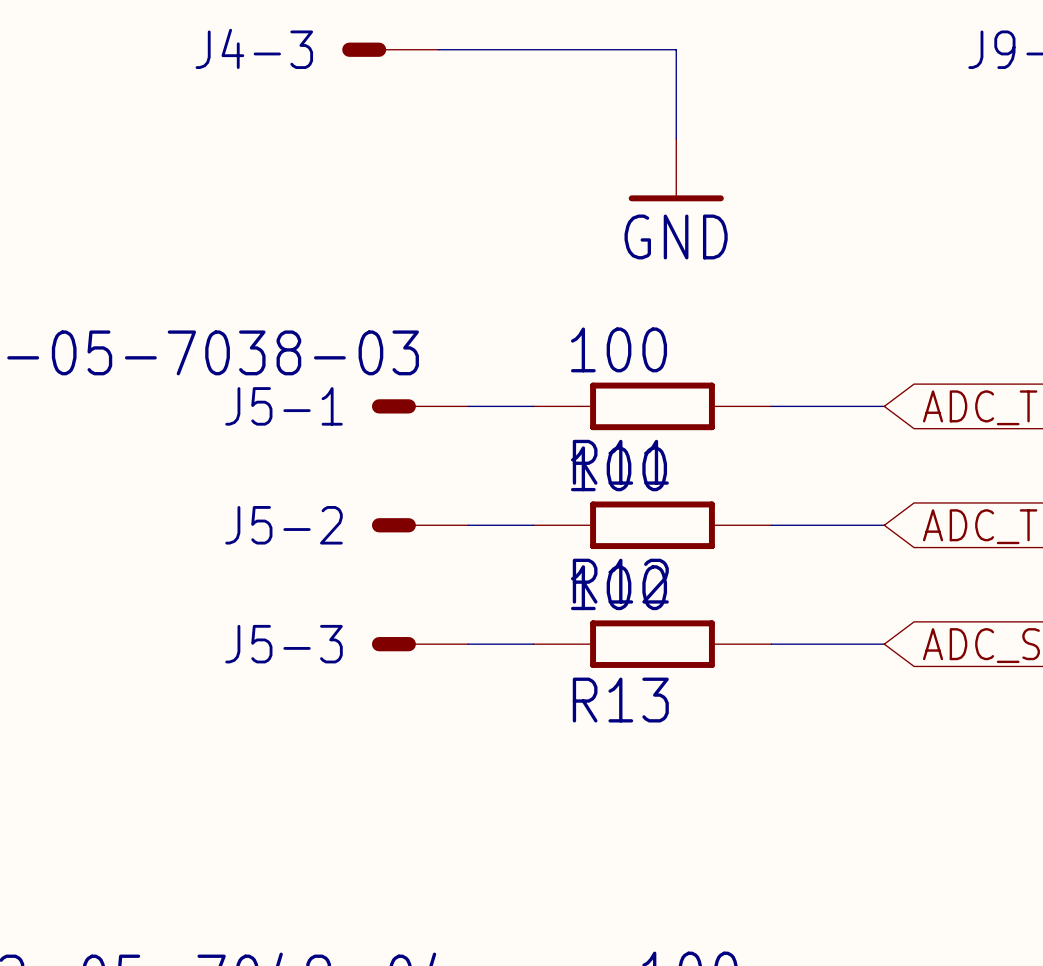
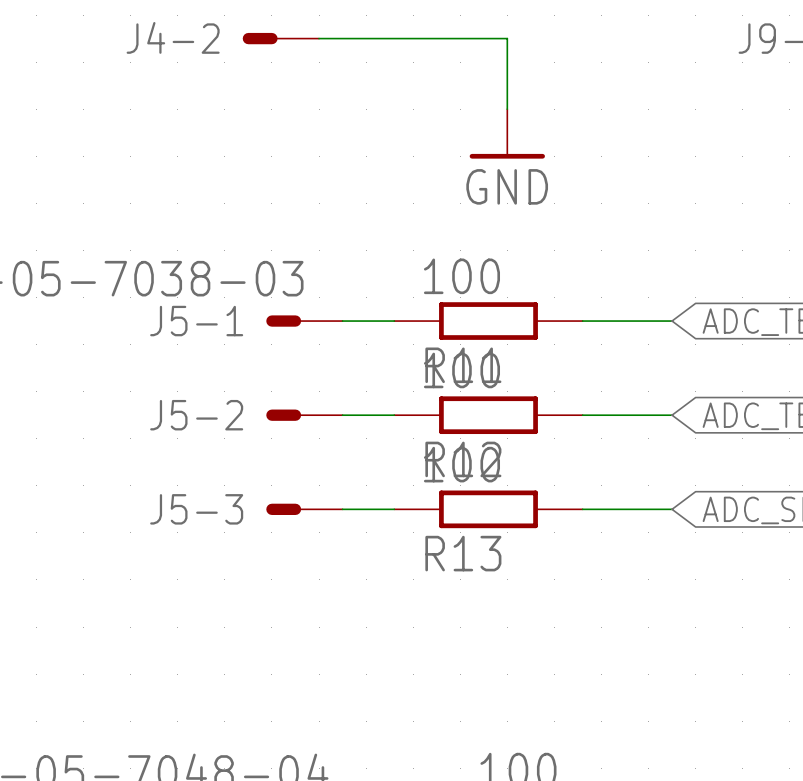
J4-3 name: J4-3 (254, 48) -> J4-2 (173, 37)

